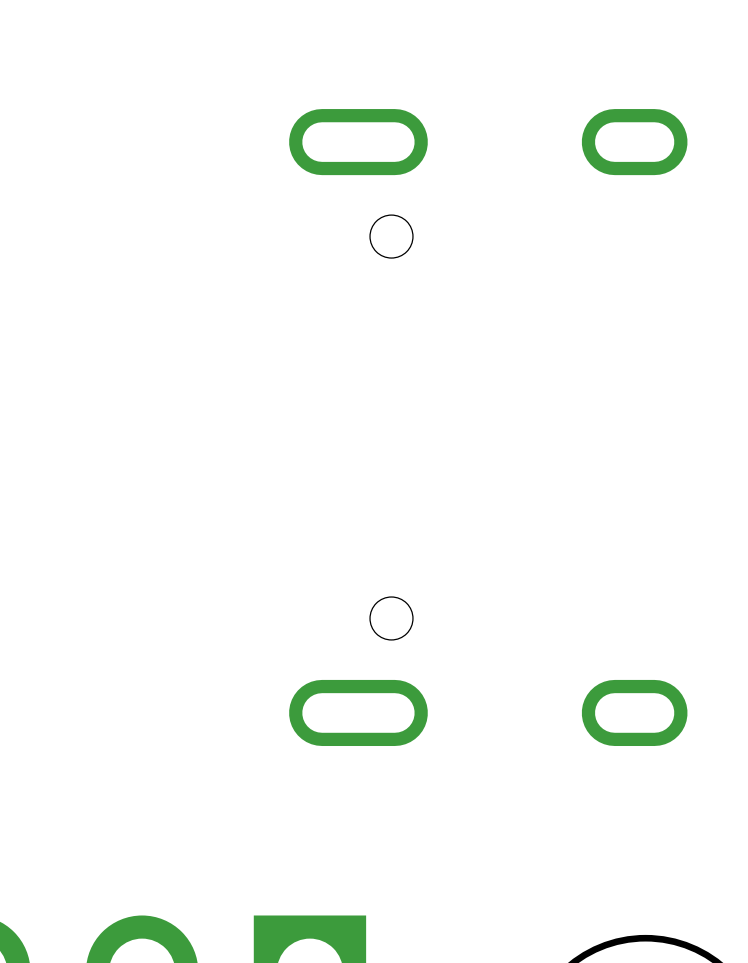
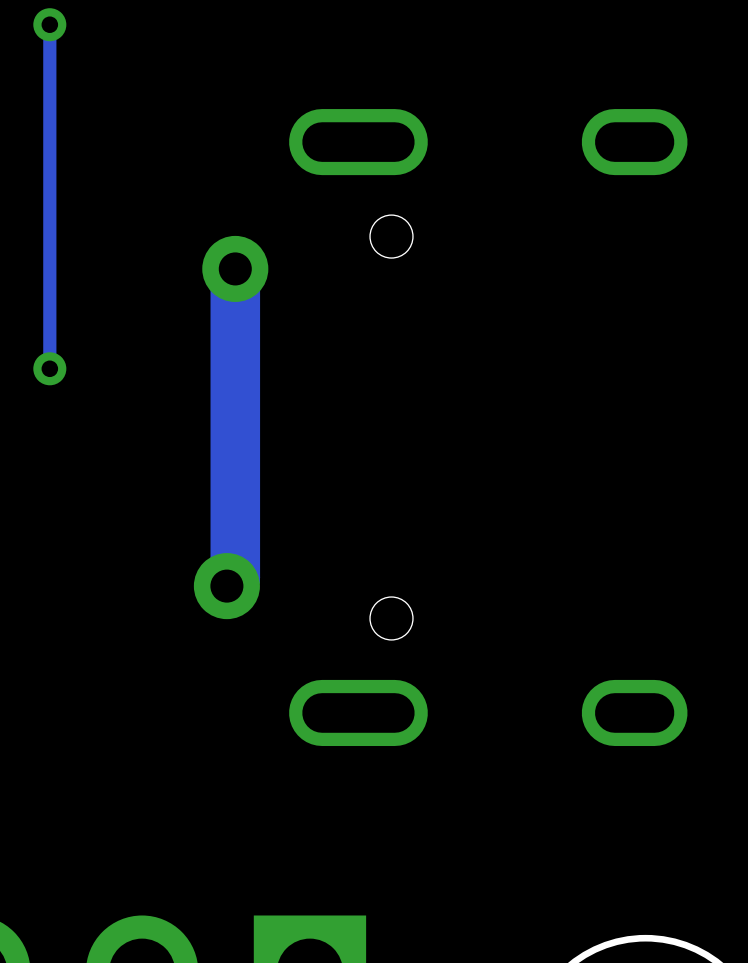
track: none -> (49, 24) (49, 368)
via: none -> (49, 24)
track: none -> (235, 268) (235, 577) (226, 586)
via: none -> (235, 268)
via: none -> (49, 368)
via: none -> (226, 586)

